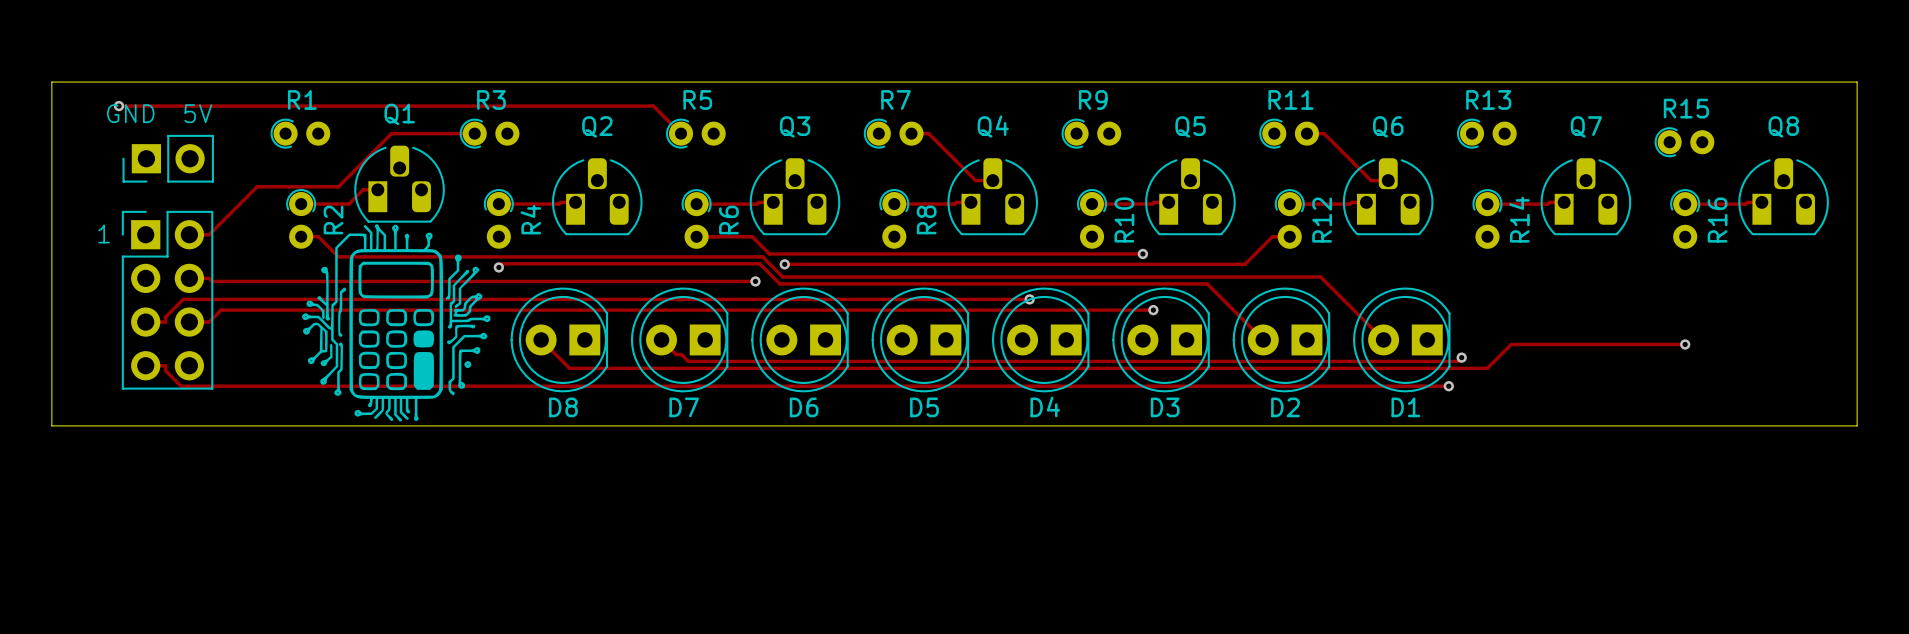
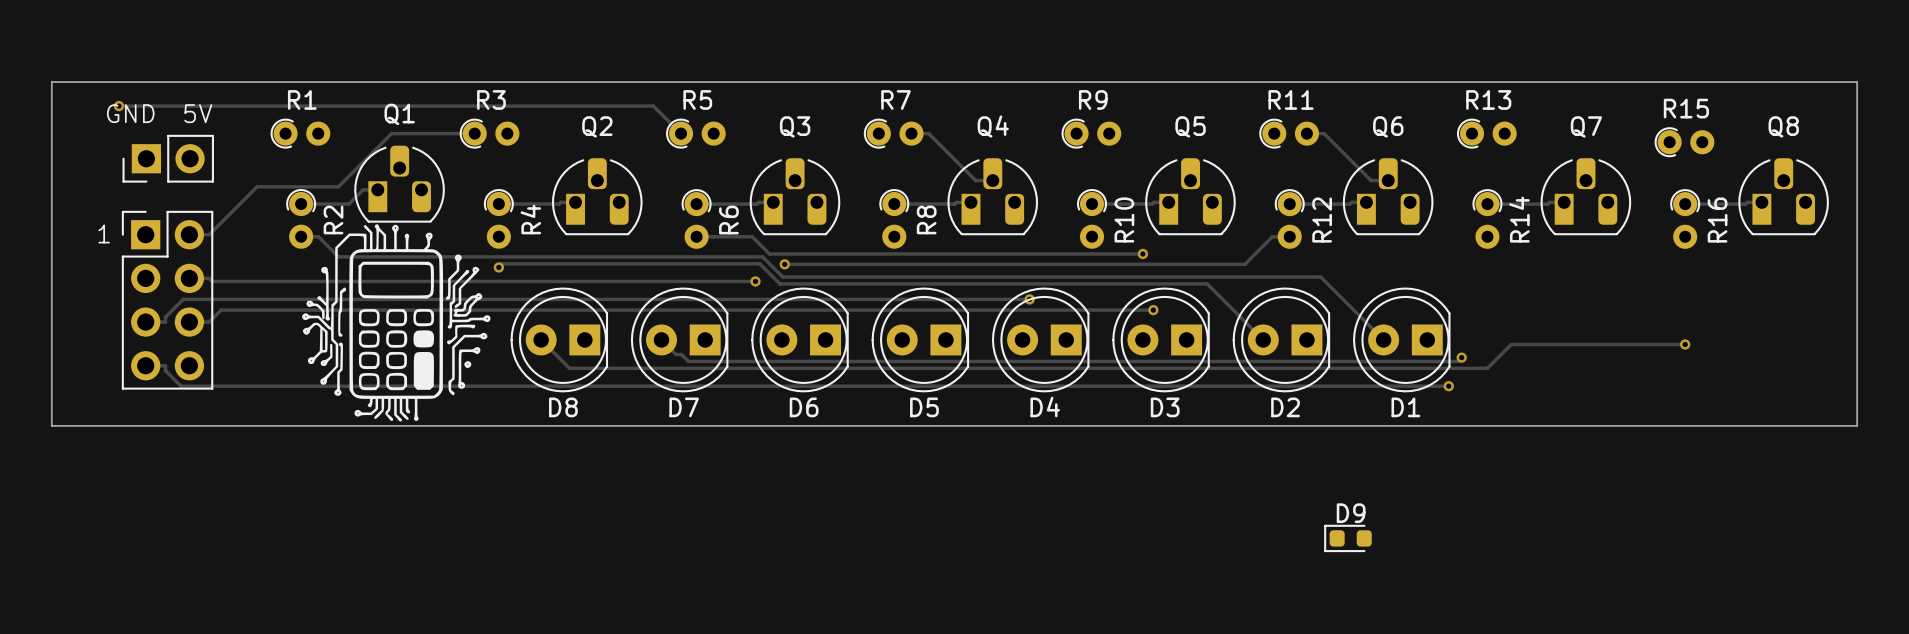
D9: none -> (1347, 538)

